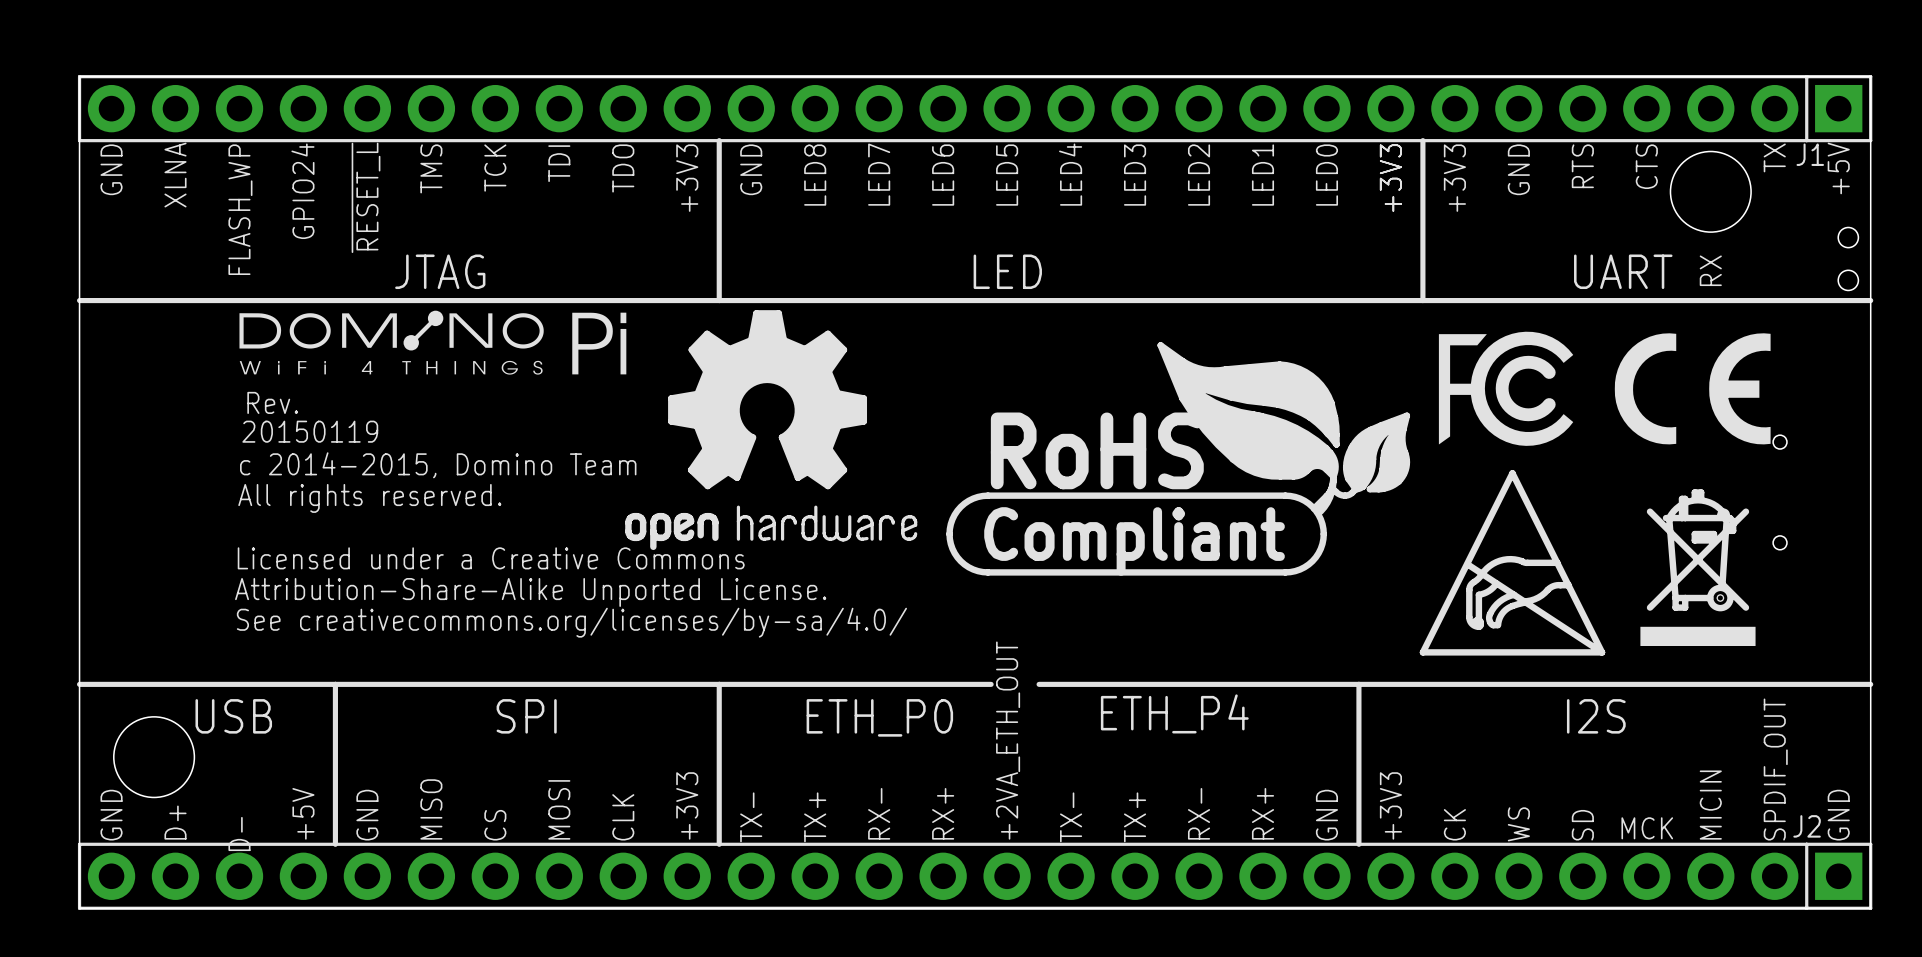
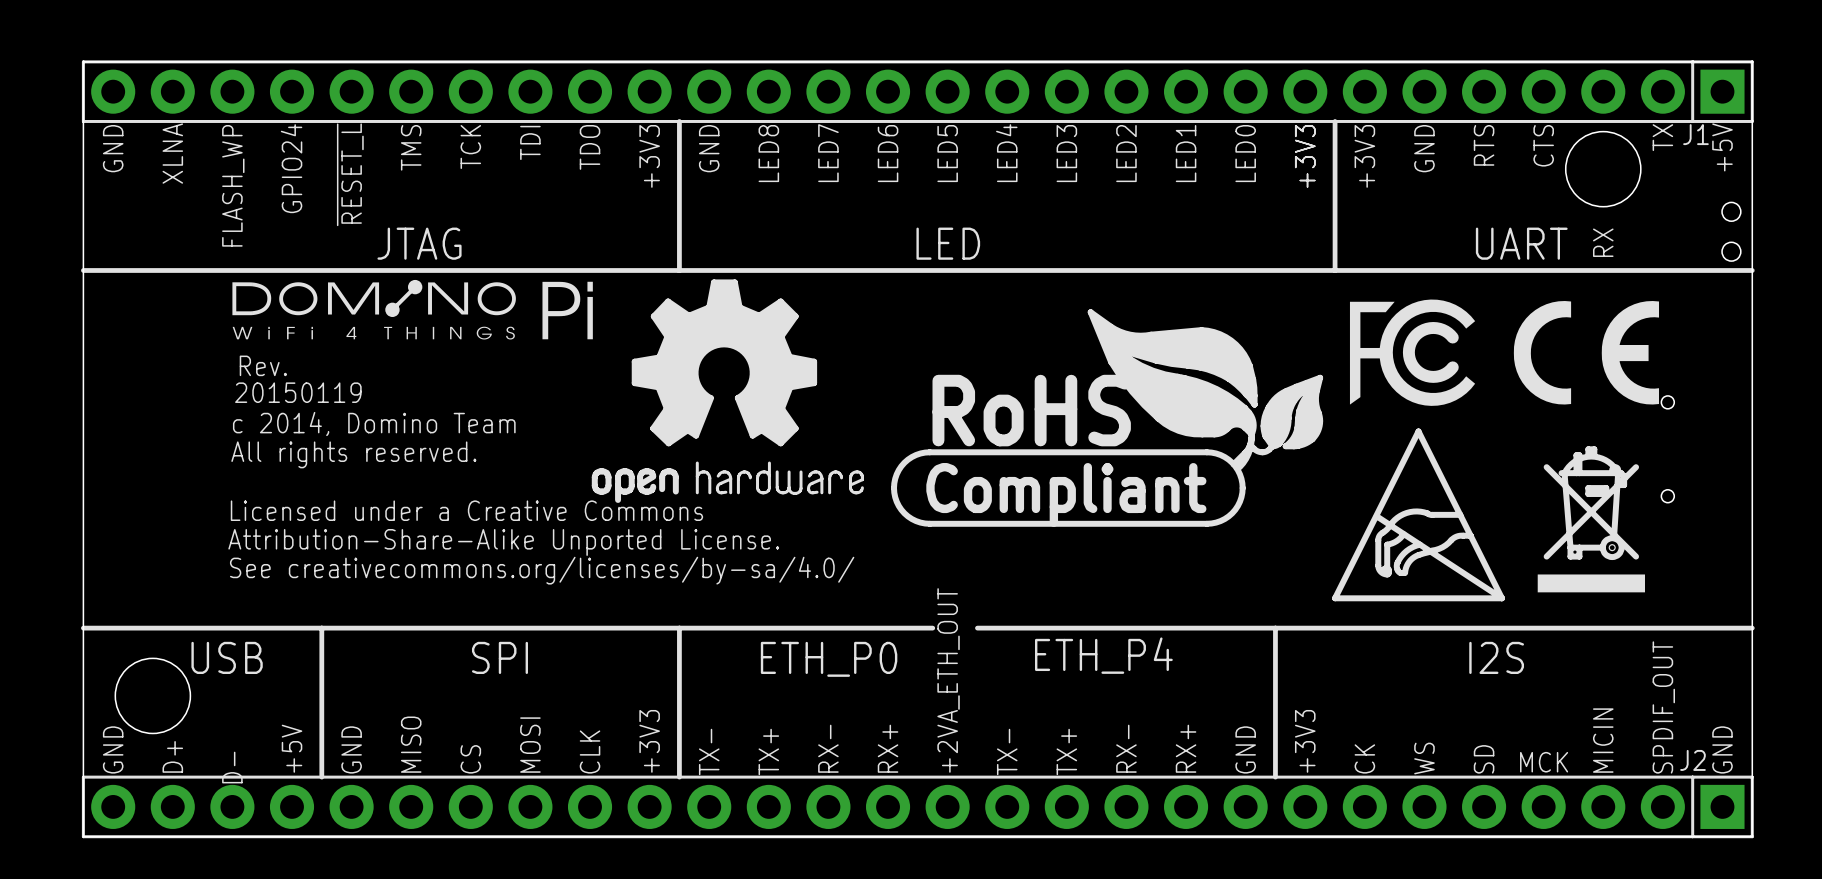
text: c 2014-2015, Domino Team (438, 465) -> c 2014, Domino Team (374, 423)

